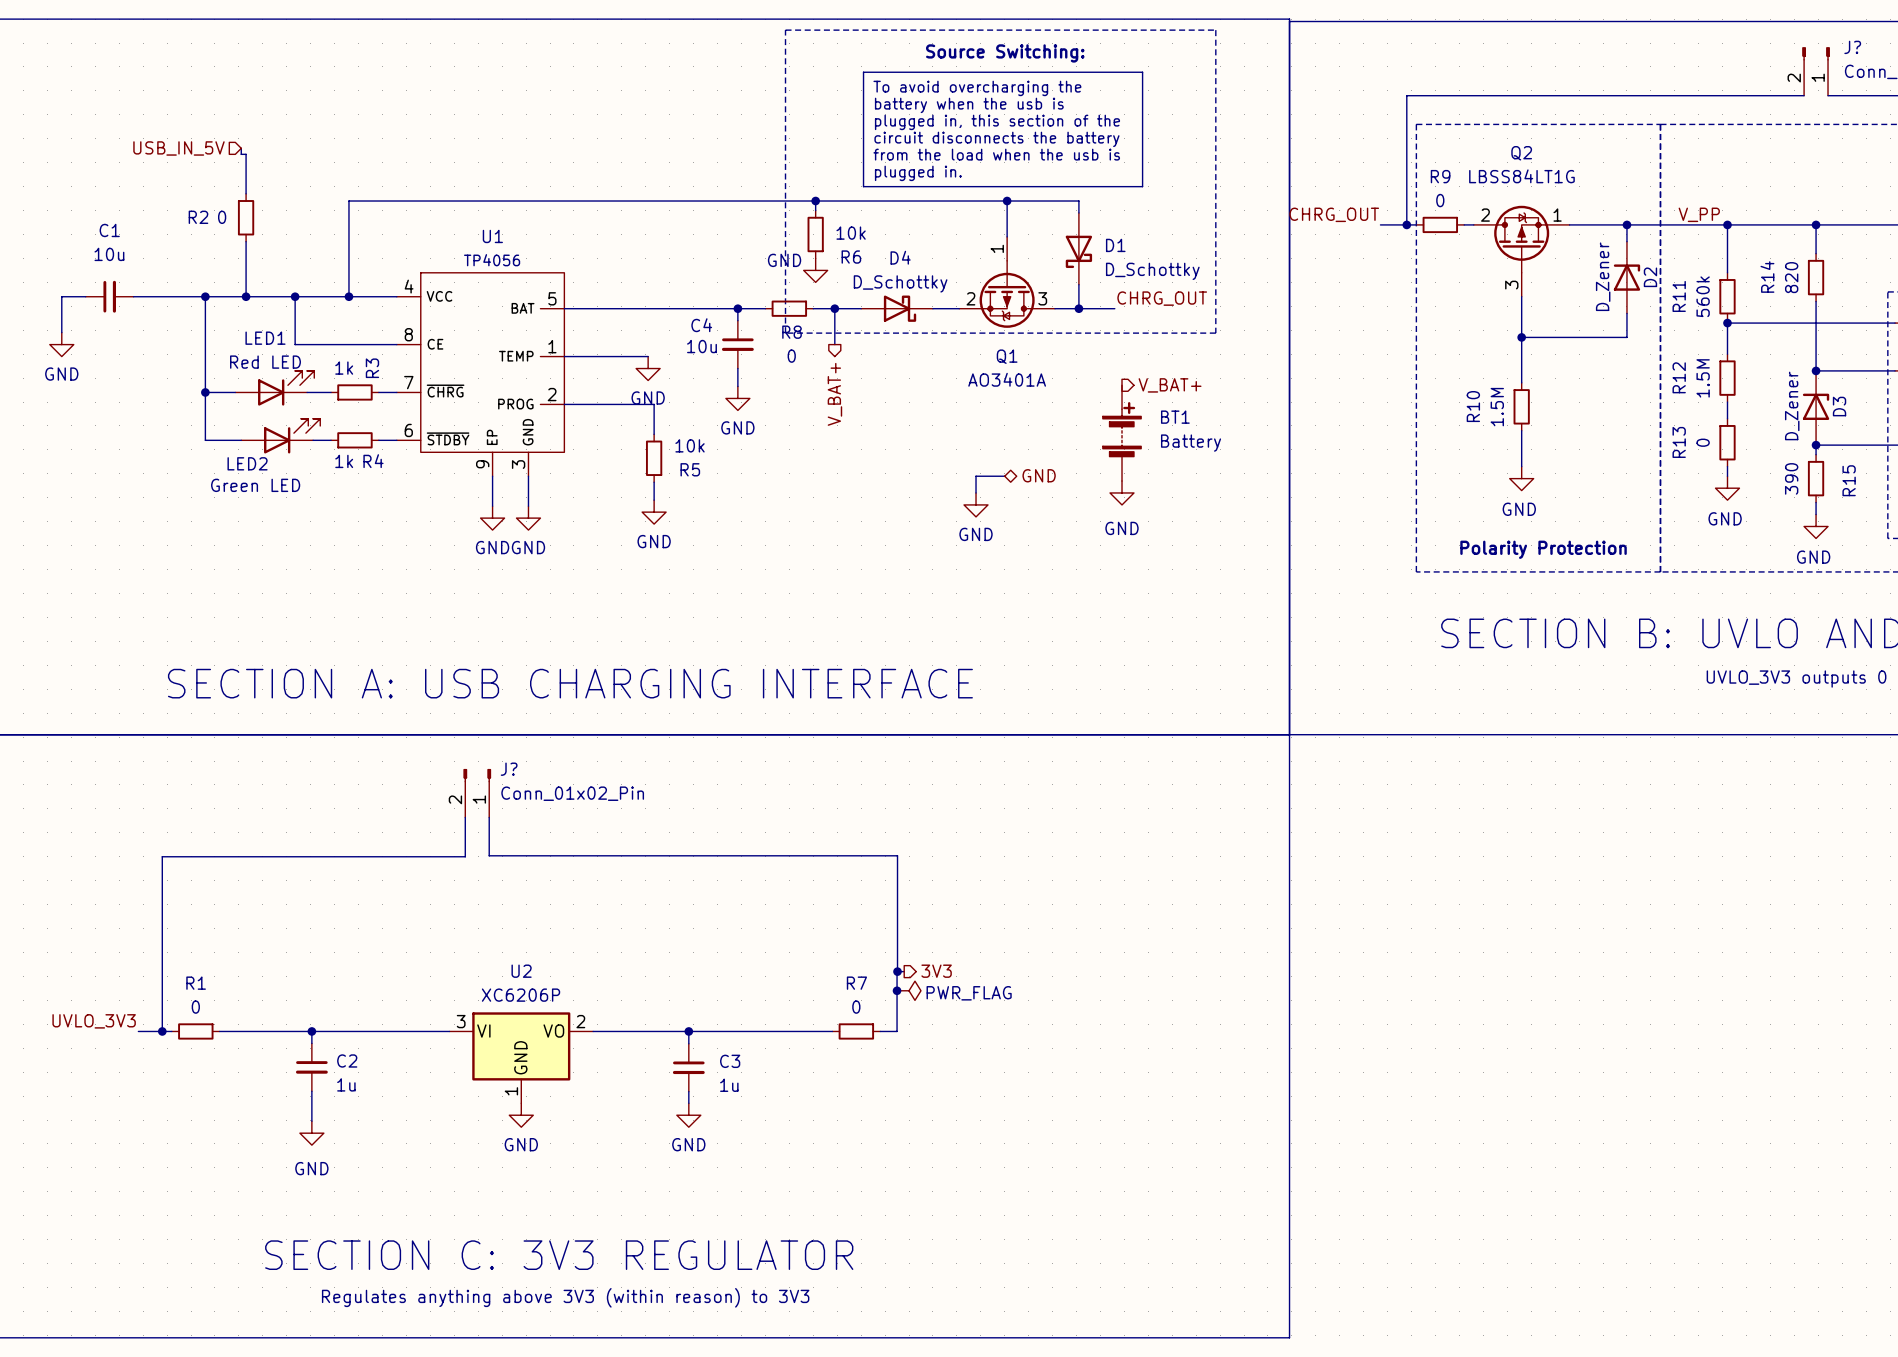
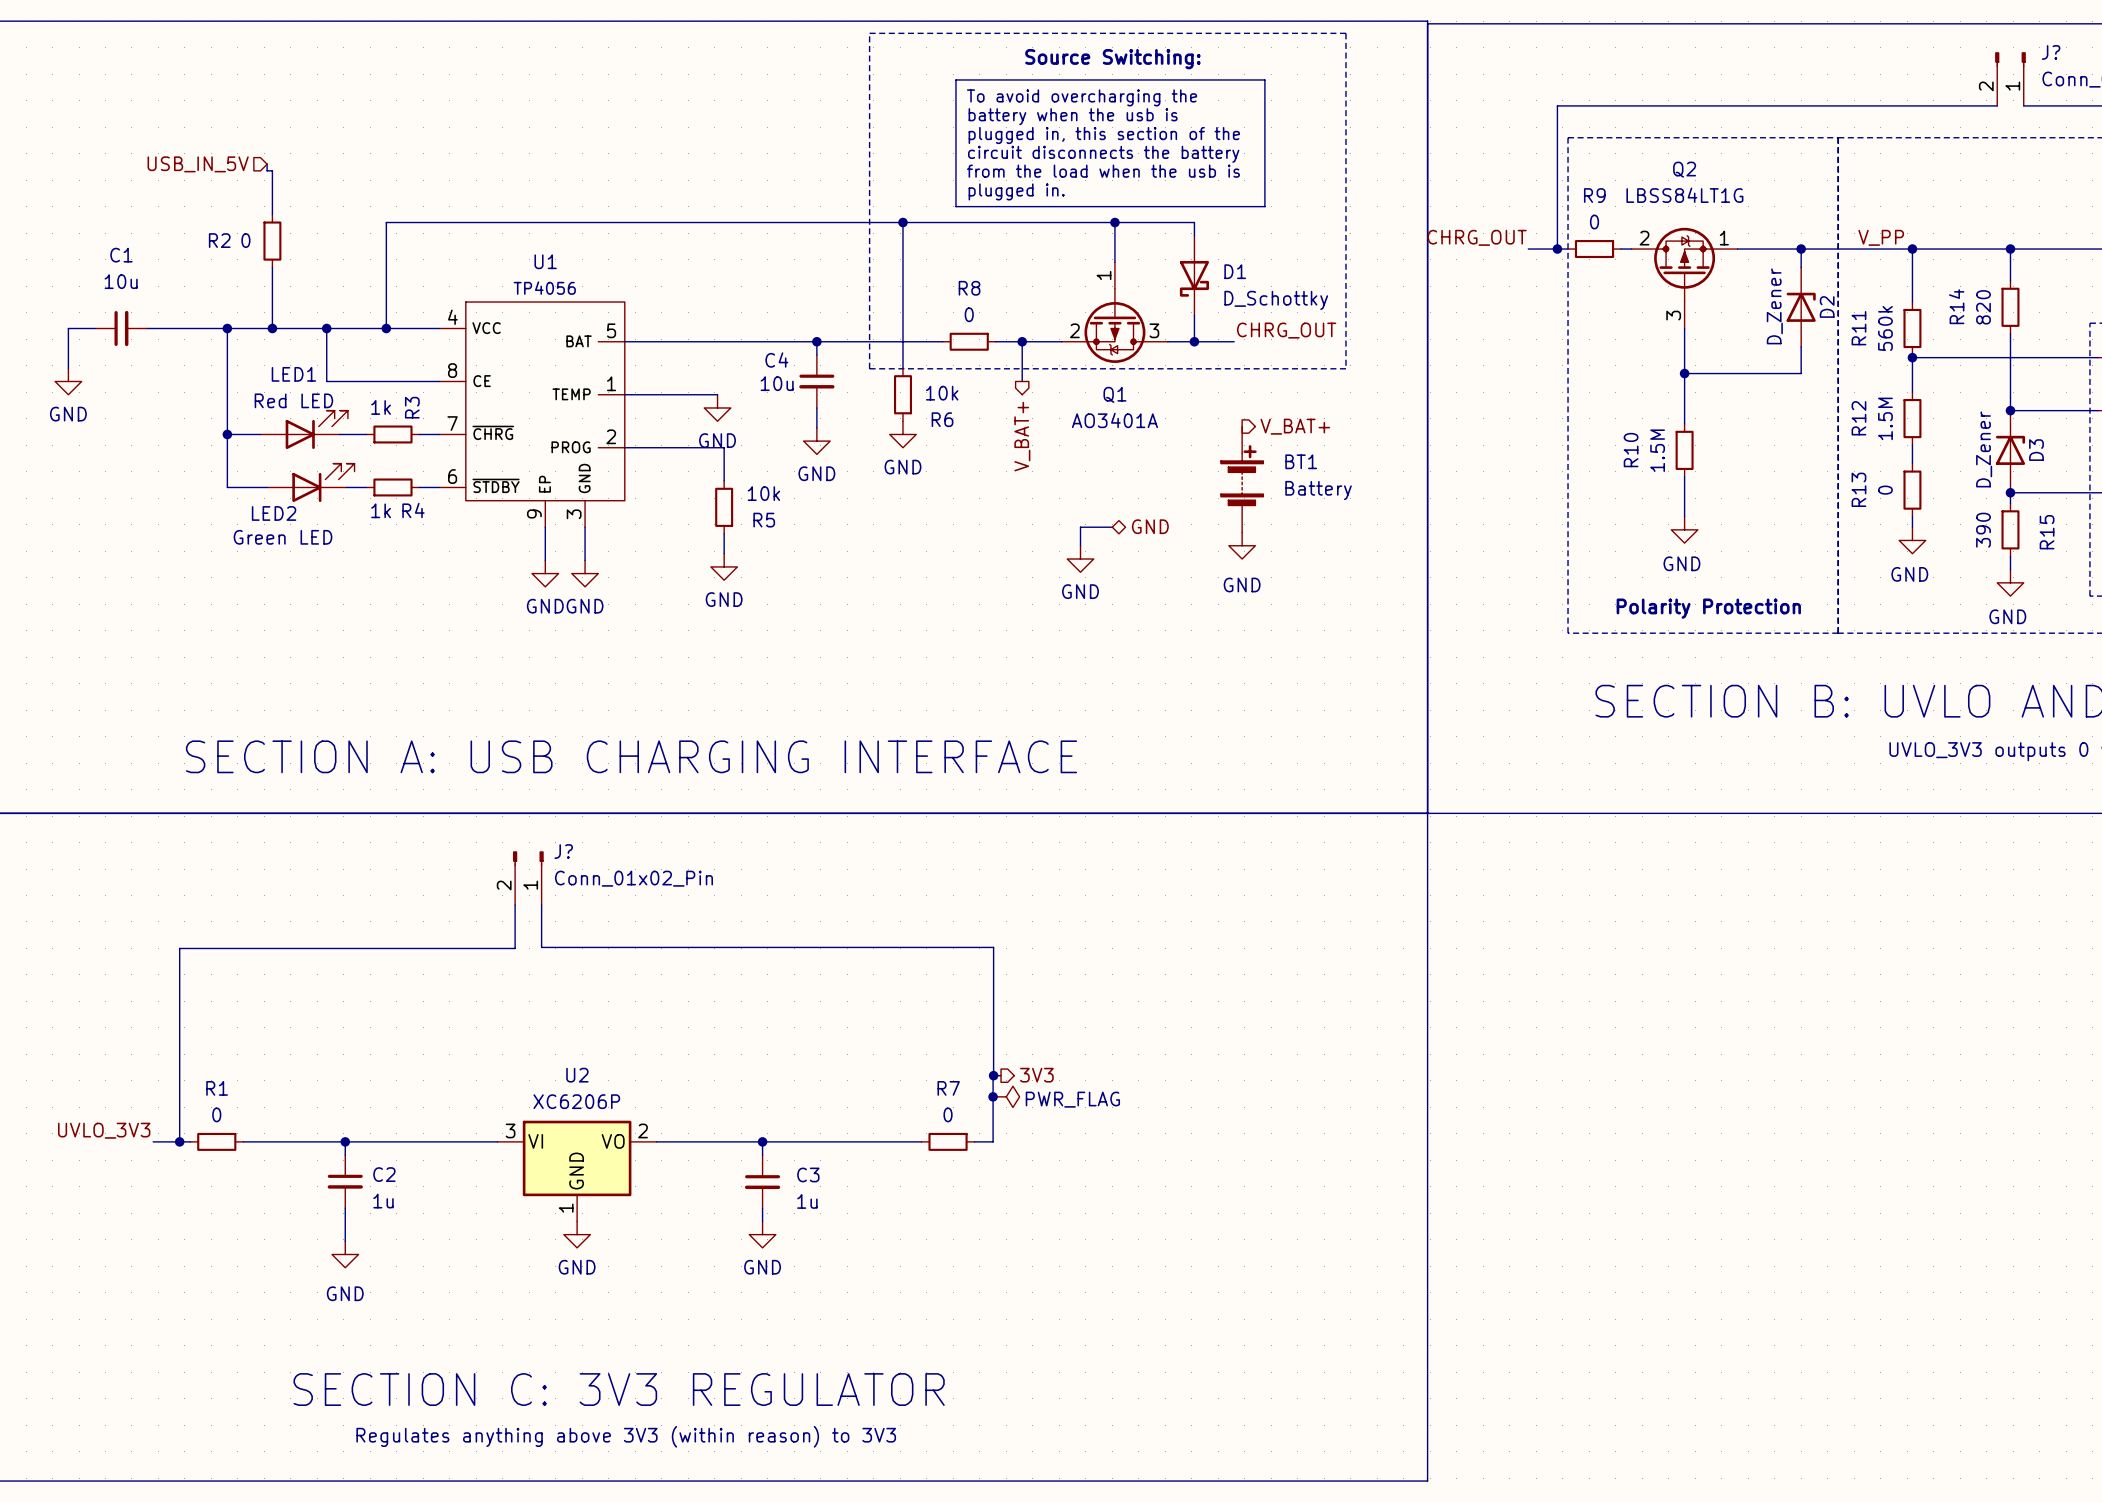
wire: none -> (902, 233) (902, 368)
R6 position: (815, 234) -> (902, 394)
power symbol text position: GND (784, 260) -> GND (902, 467)
power symbol position: GND (815, 270) -> GND (902, 434)
wire: none -> (847, 341) (900, 341)
R8 position: (789, 308) -> (969, 341)
wire: (834, 308) (834, 344) -> (1022, 341) (1022, 381)
junction: (834, 308) -> none
D4: D_Schottky (897, 308) -> none
junction: none -> (1022, 341)
R8 name position: R8 (792, 332) -> R8 (969, 288)
R8 value position: 0 (791, 356) -> 0 (969, 314)
hierarchical label position: V_BAT+ (834, 394) -> V_BAT+ (1022, 436)

